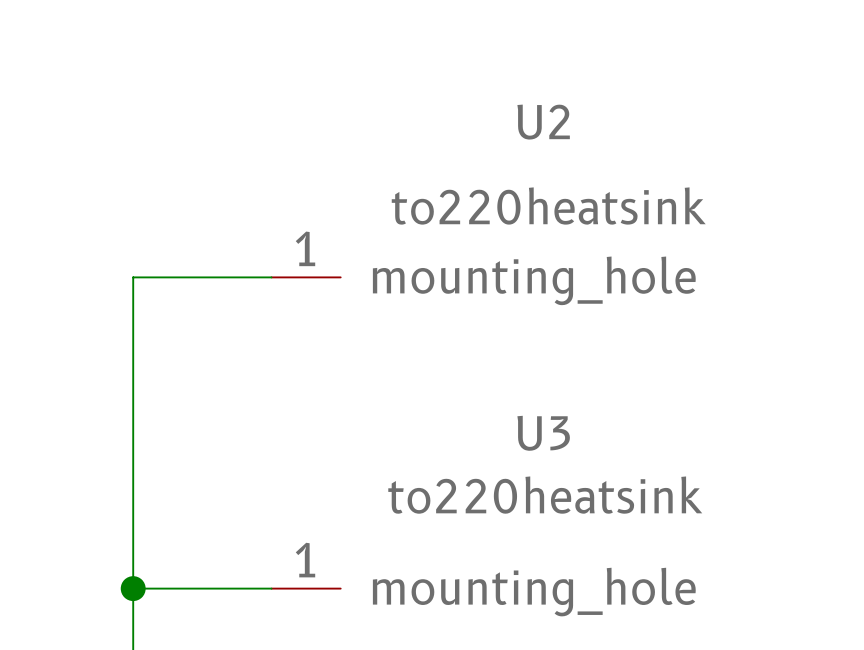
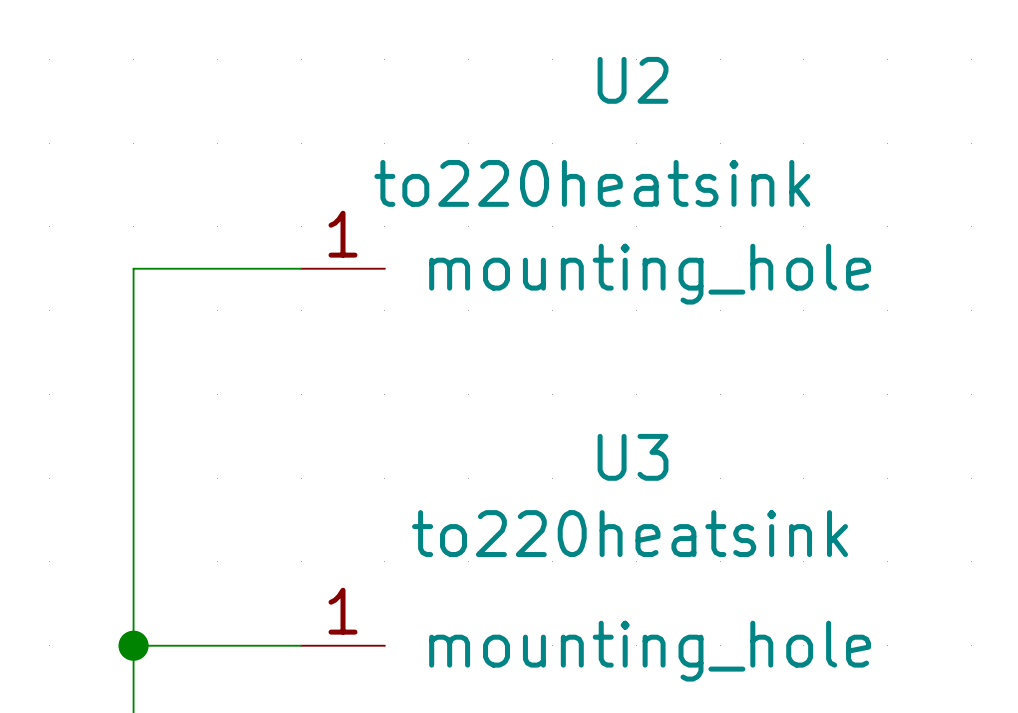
U2 value position: to220heatsink (548, 206) -> to220heatsink (592, 183)

